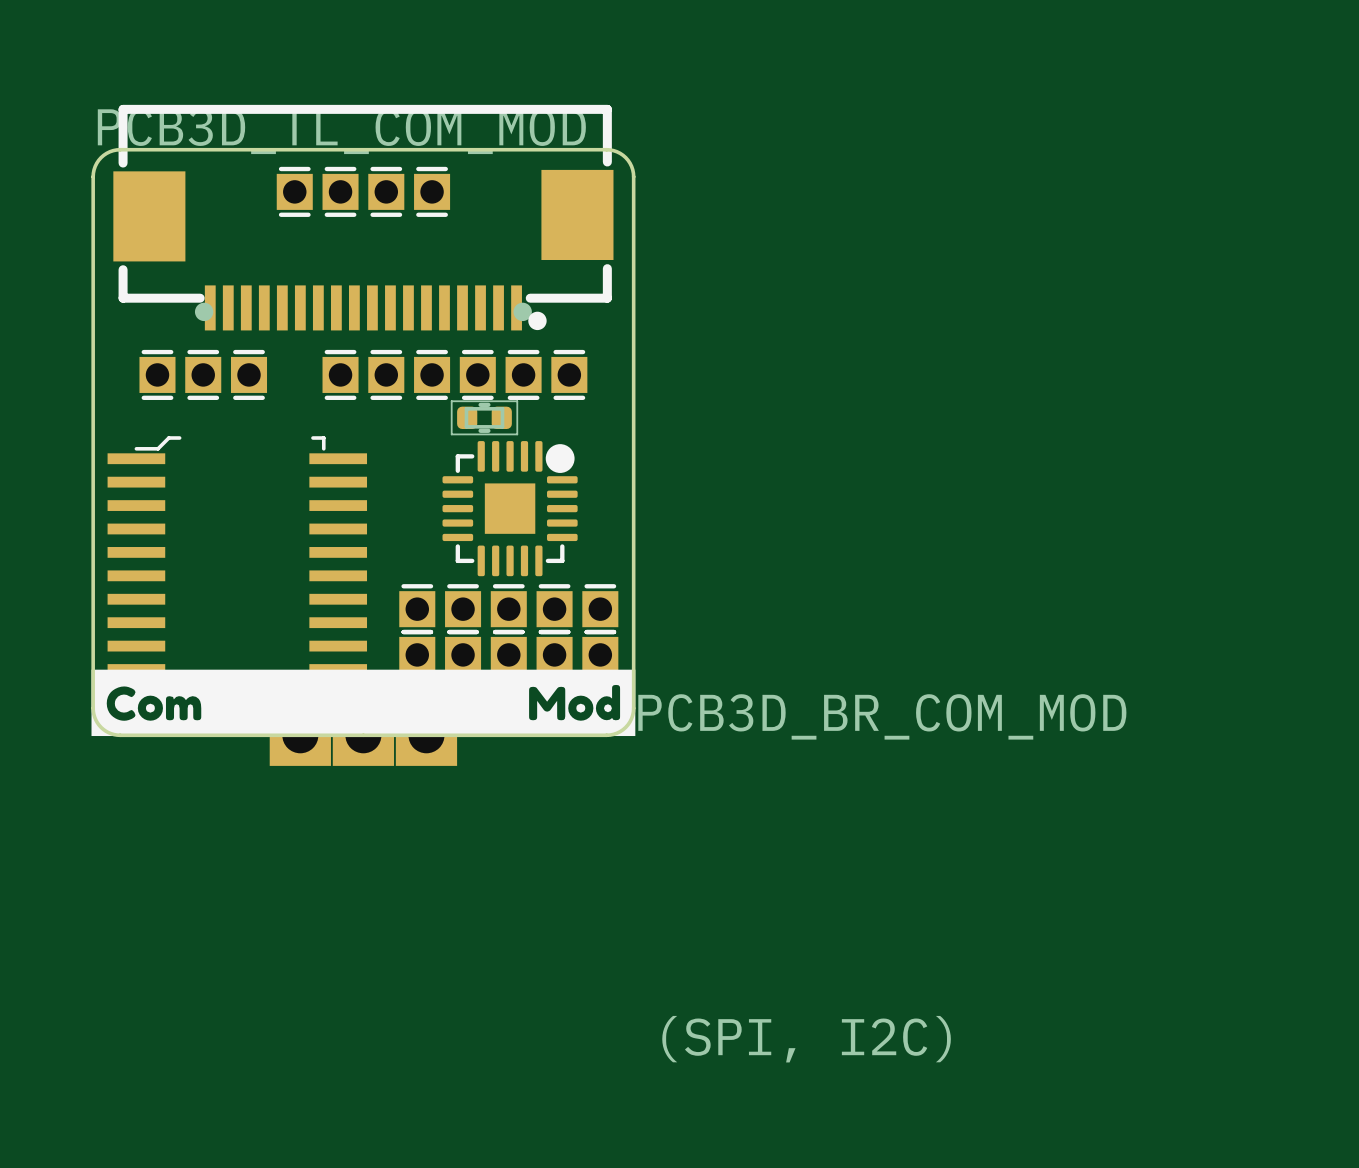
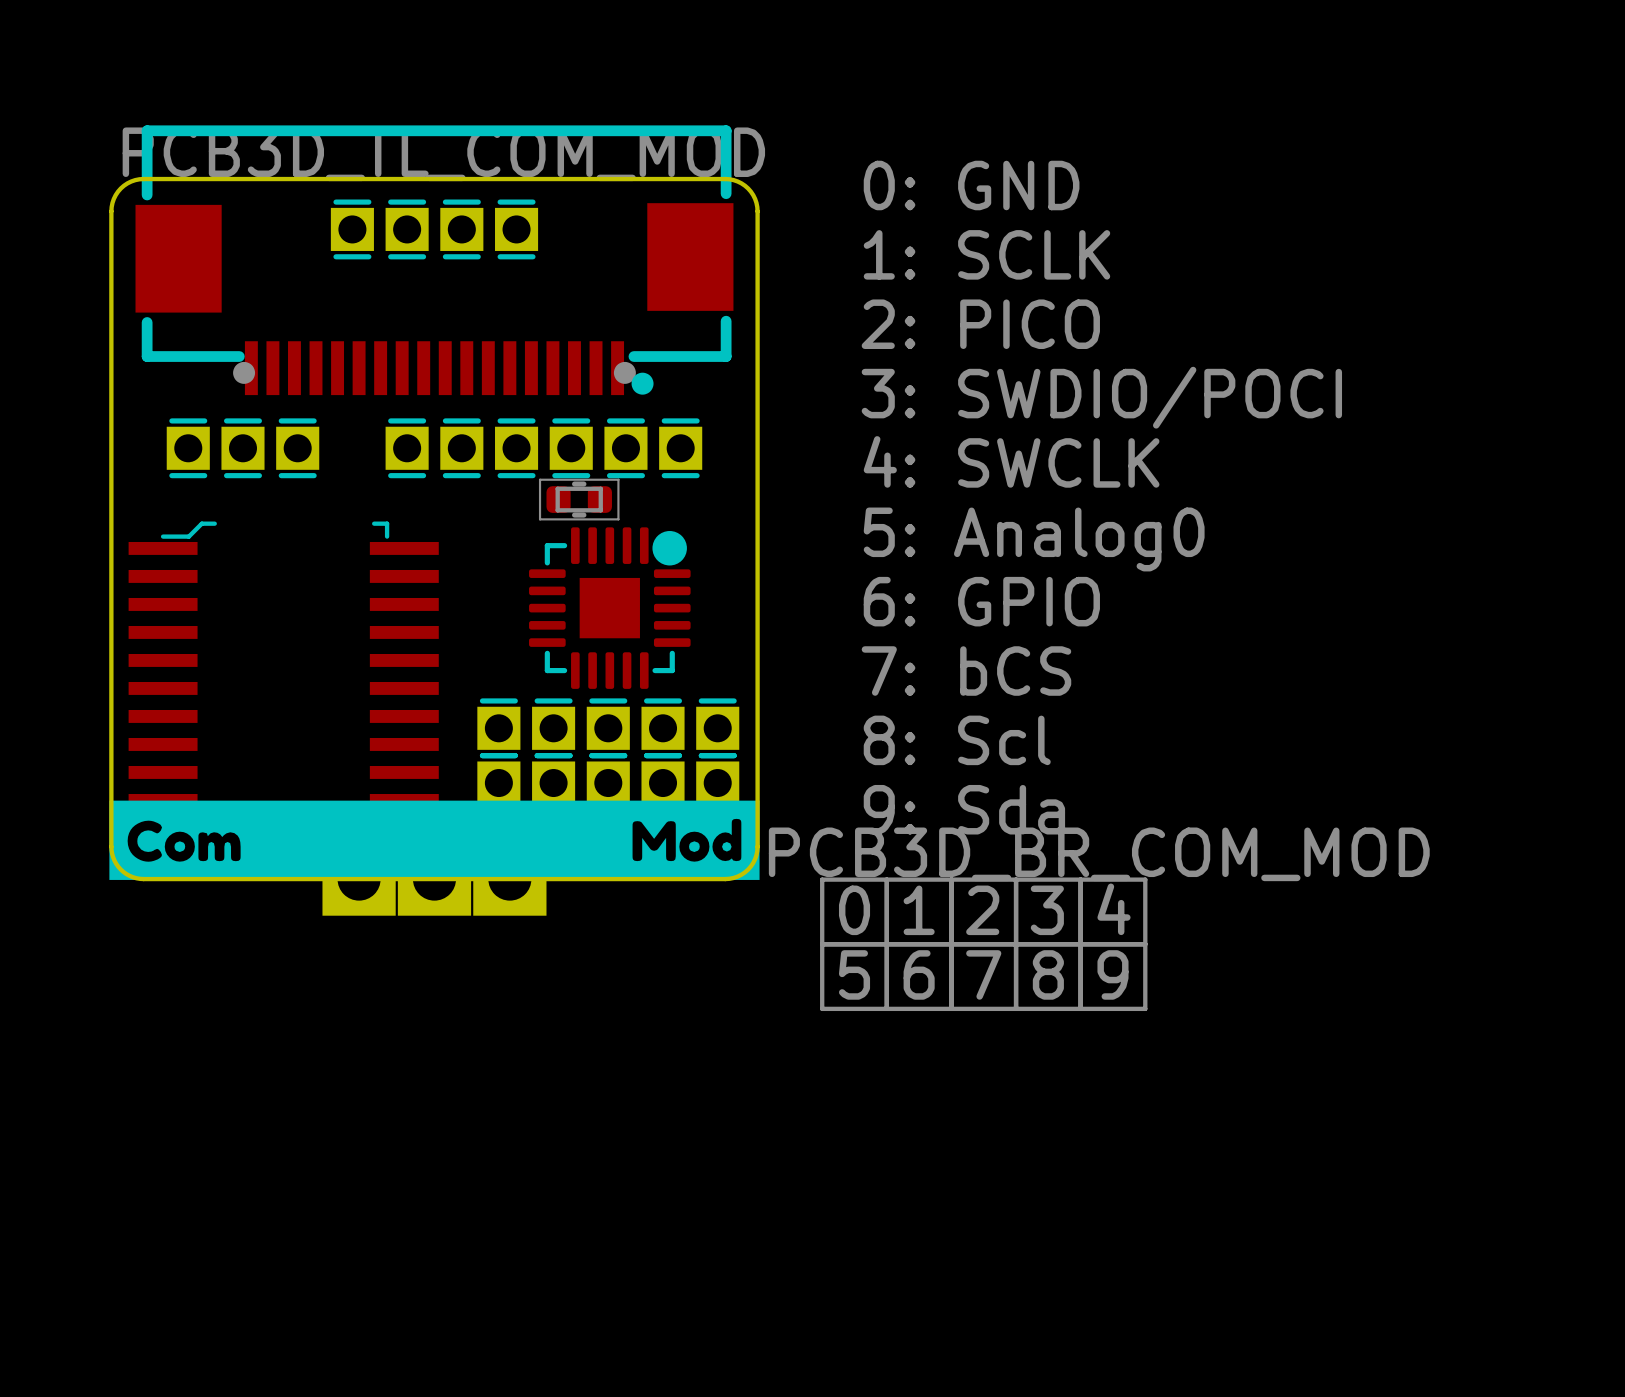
text: none -> 0: GND (971, 185)
text: none -> 1: SCLK (986, 254)
text: none -> 2: PICO (980, 324)
text: none -> 3: SWDIO/POCI (1101, 397)
text: none -> 4: SWCLK (1011, 461)
text: none -> 5: Analog0 (1034, 539)
text: none -> 6: GPIO (981, 601)
text: none -> 7: bCS (966, 671)
text: none -> 8: Scl (957, 740)
text: none -> 9: Sda (964, 809)
line: none -> (822, 879) (1145, 879) (1145, 1008) (822, 1008) (822, 879)
line: none -> (886, 879) (886, 1008)
line: none -> (951, 879) (951, 1008)
line: none -> (1016, 879) (1016, 1008)
line: none -> (1080, 879) (1080, 1008)
text: none -> 0 (854, 910)
text: none -> 1 (919, 910)
text: none -> 2 (982, 910)
text: none -> 3 (1047, 910)
text: none -> 4 (1114, 909)
line: none -> (822, 944) (1145, 944)
text: none -> 5 (854, 974)
text: none -> 6 (919, 974)
text: none -> 7 (983, 974)
text: none -> 8 (1048, 974)
text: none -> 9 (1112, 974)
text: (SPI, I2C) (806, 1039) -> none

